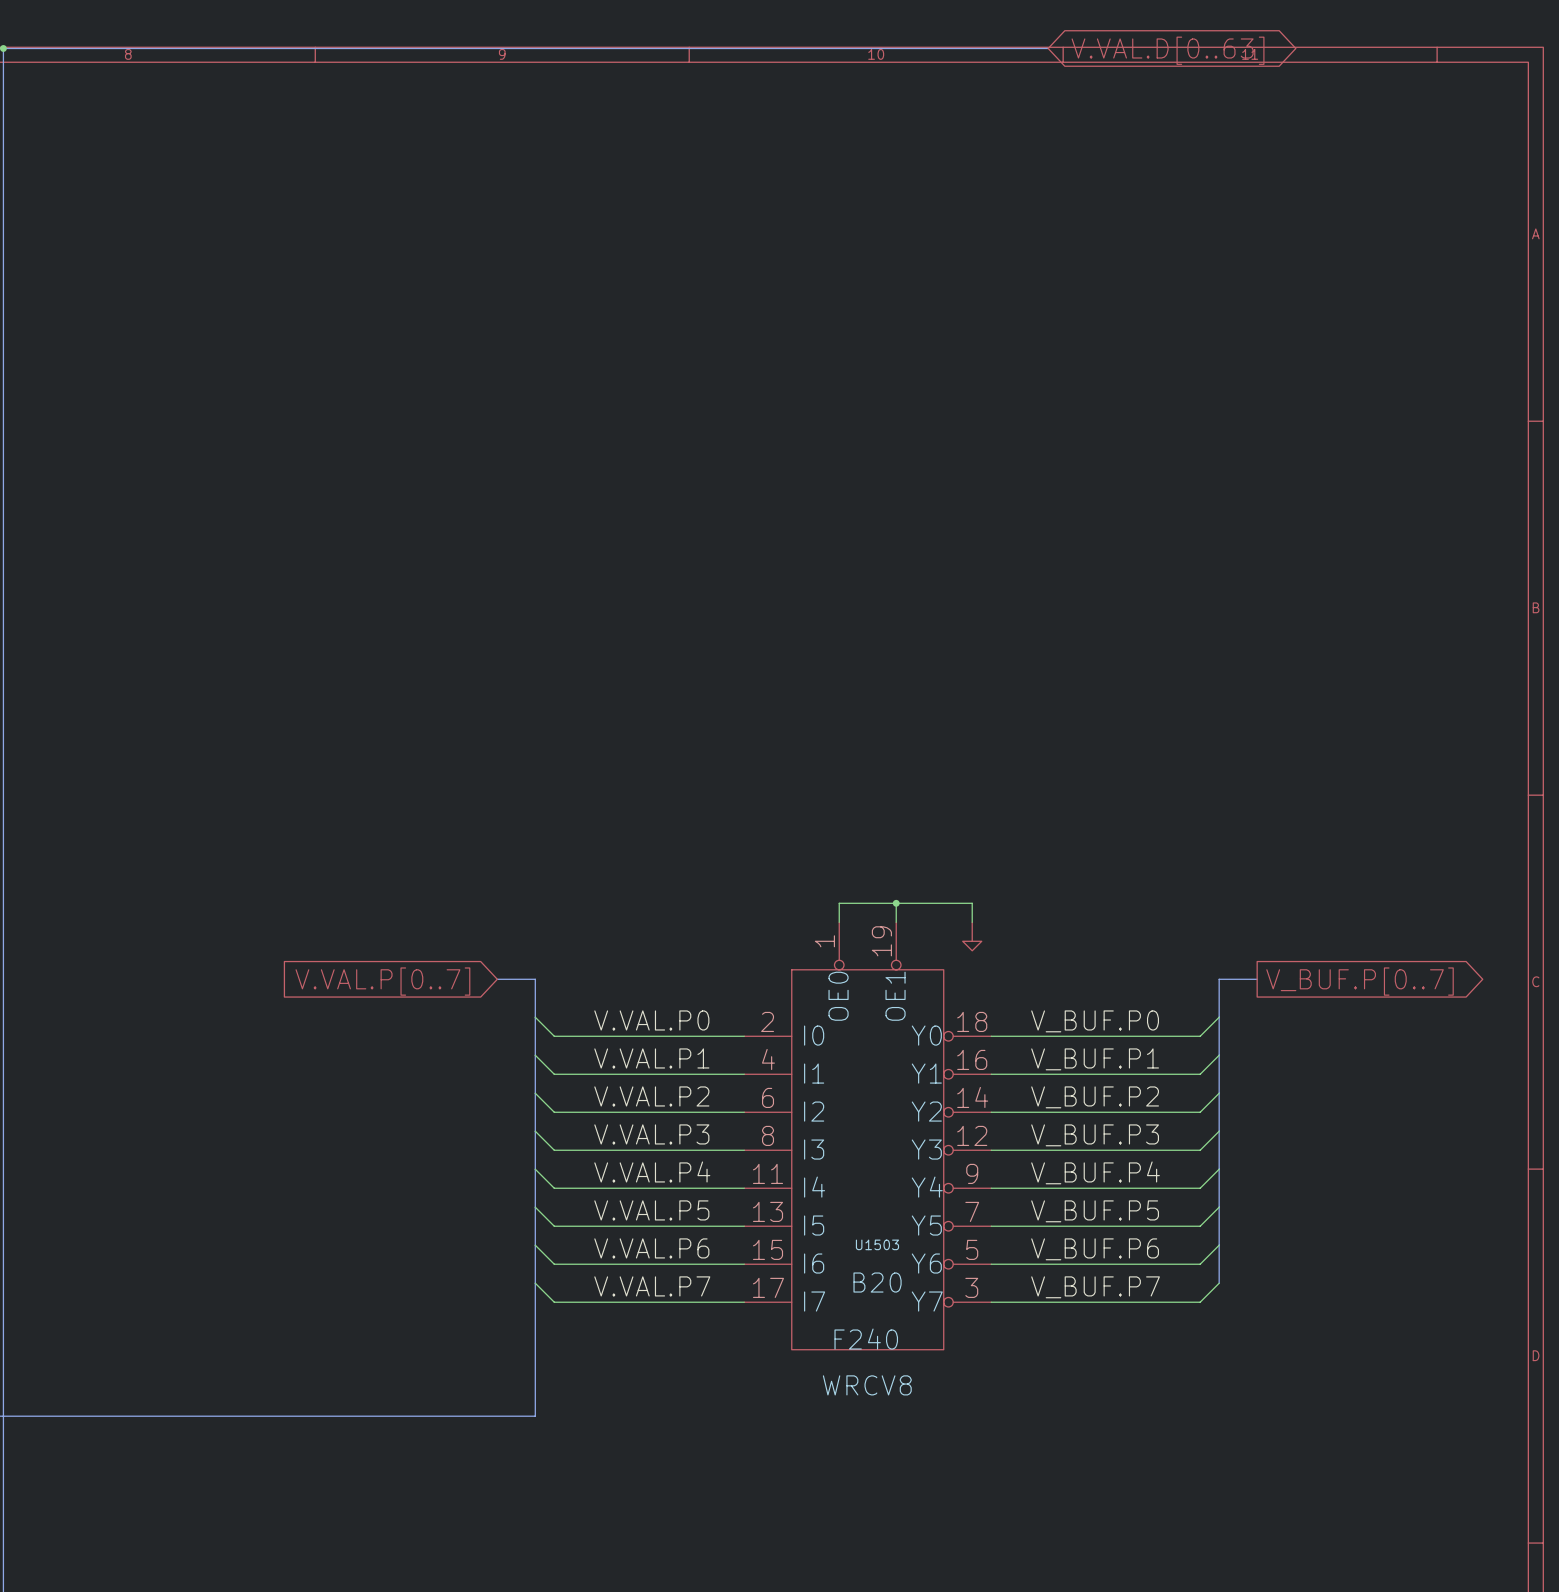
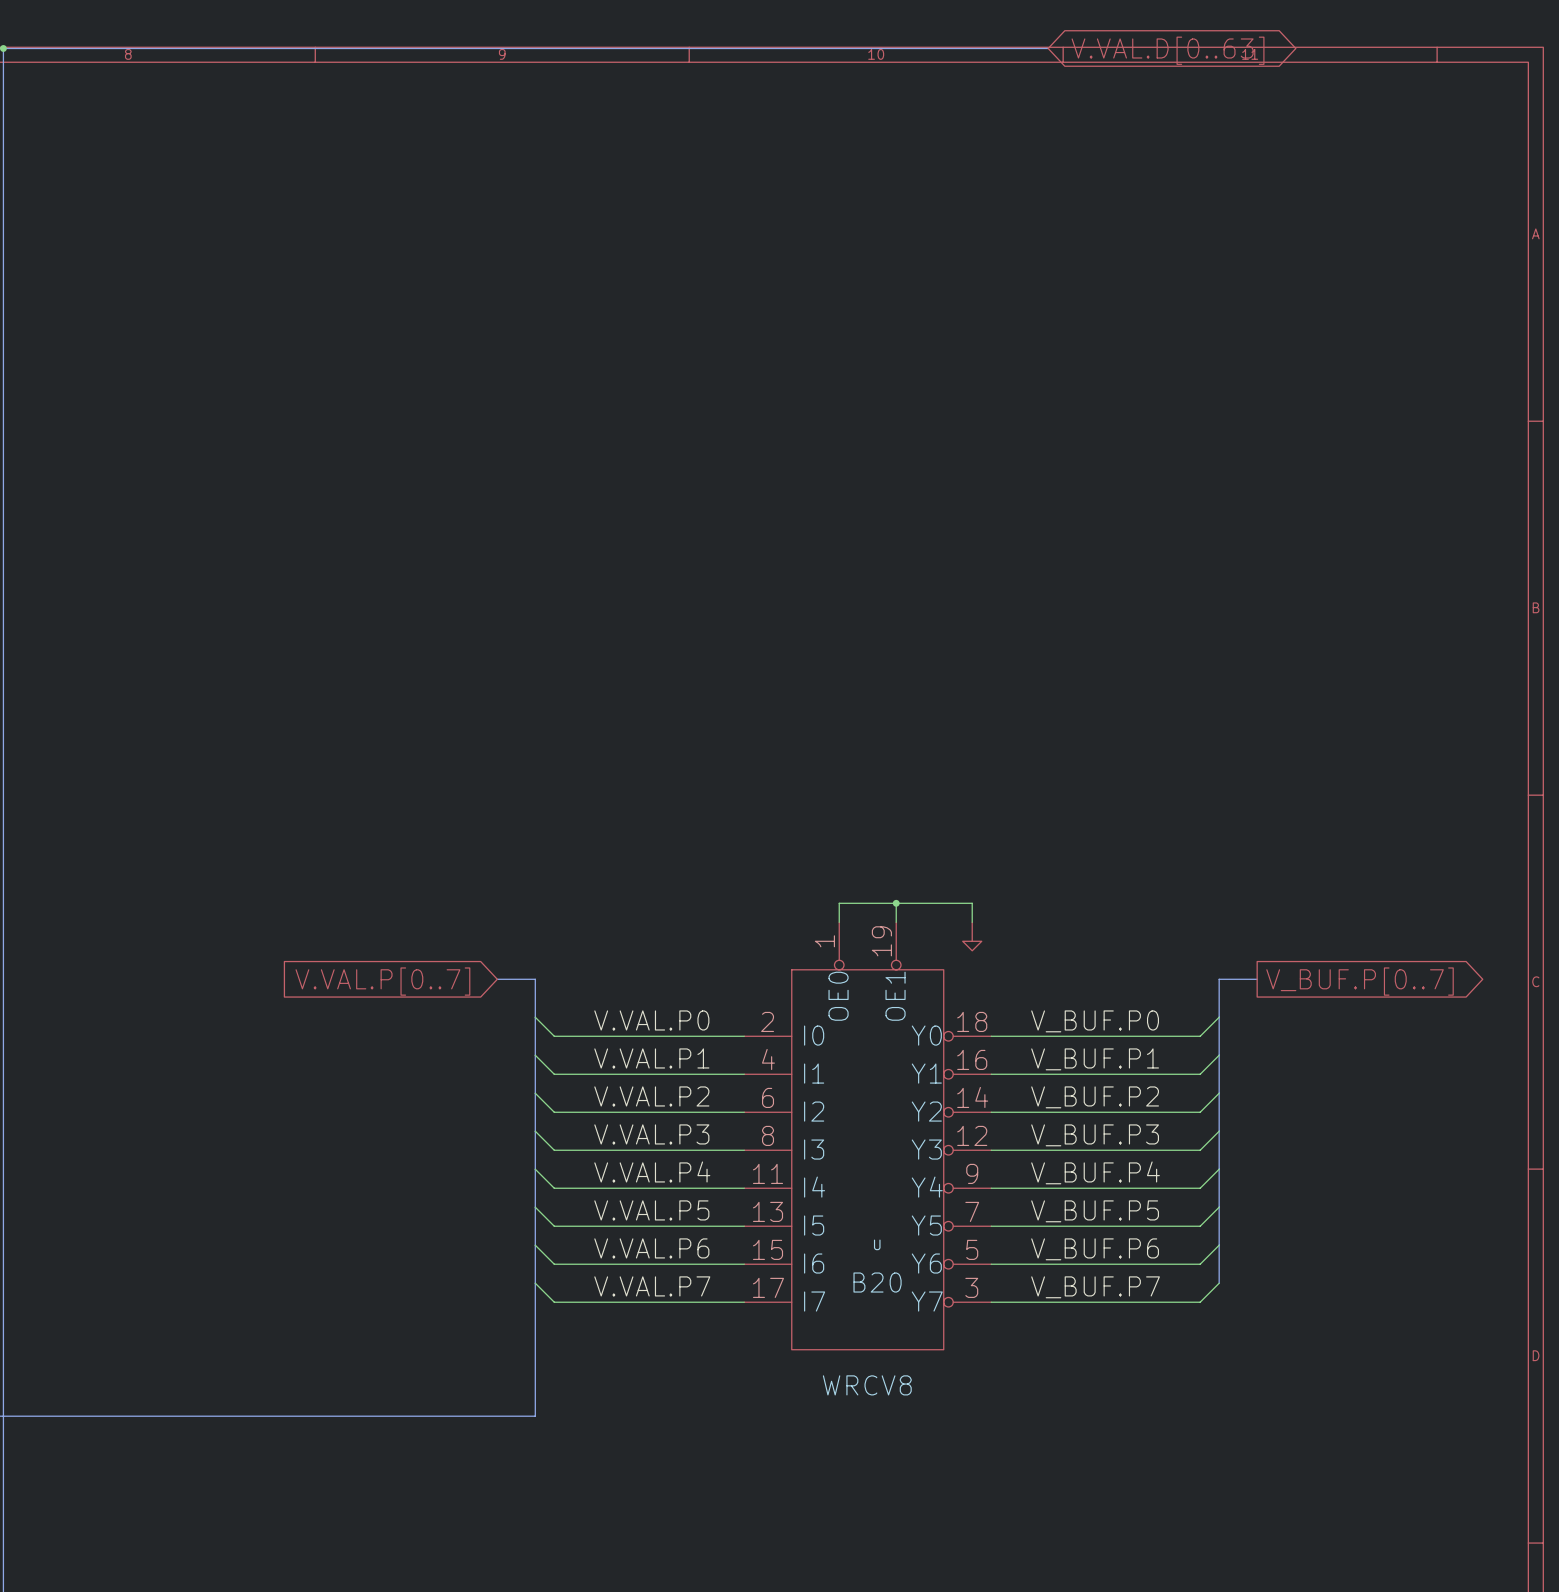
U1503 name: U1503 (877, 1244) -> U (877, 1244)
U1503 value: F240 (866, 1339) -> none

